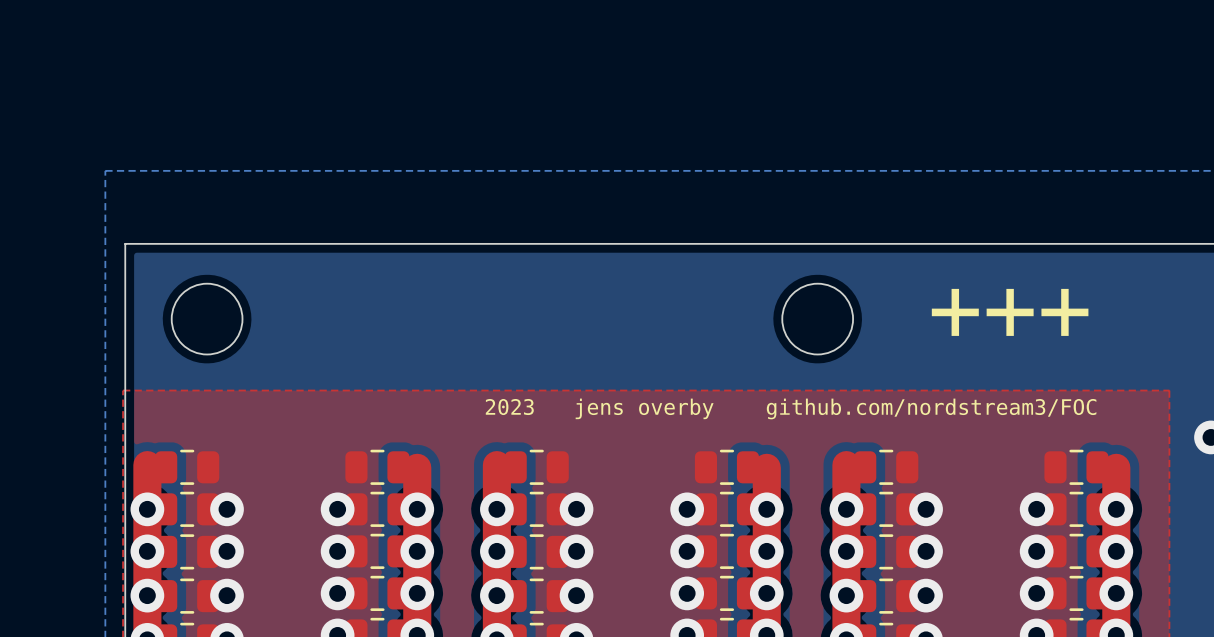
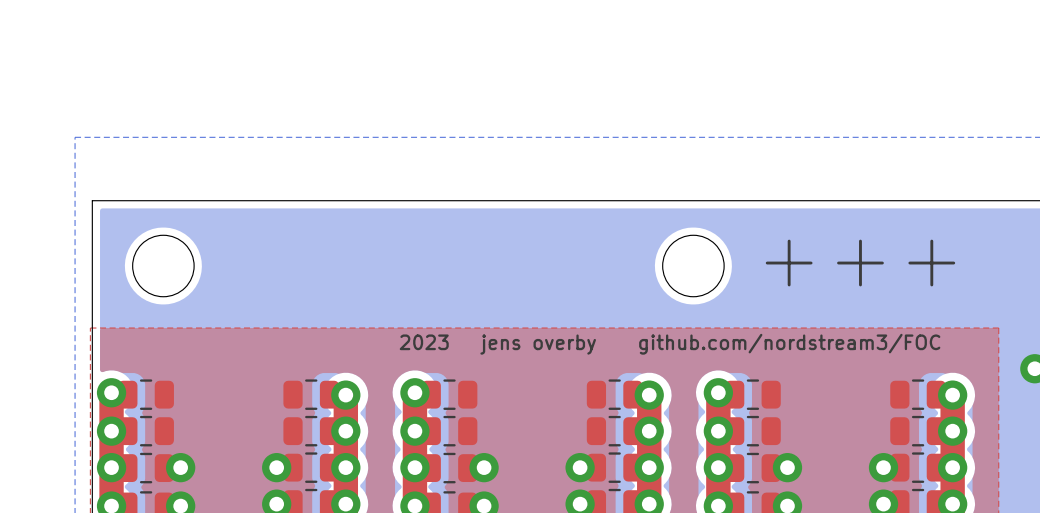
via: none -> (414, 392)
via: none -> (718, 392)
via: none -> (345, 395)
via: none -> (649, 395)
via position: (227, 509) -> (111, 392)
via: (337, 509) -> none
via: (576, 509) -> none
via: (687, 509) -> none
via: (926, 509) -> none
via position: (1036, 509) -> (952, 395)

